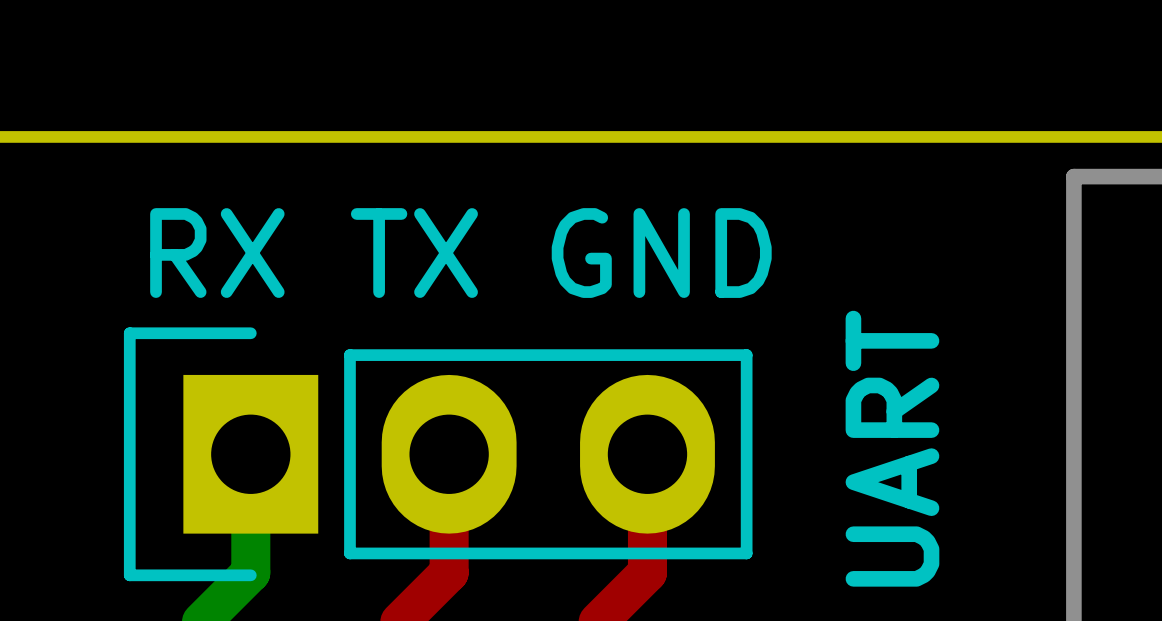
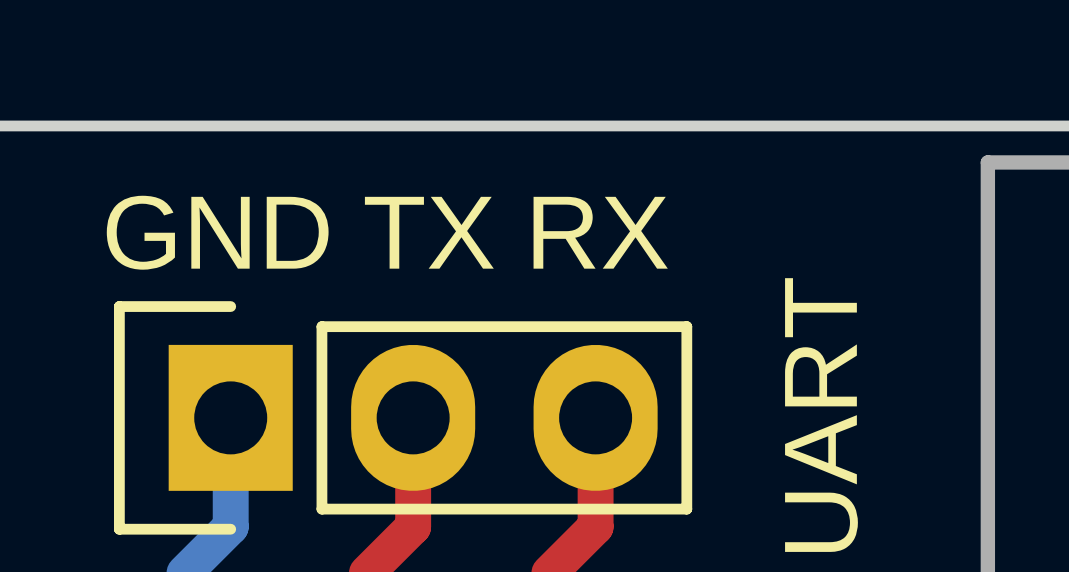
text: RX TX GND (460, 253) -> GND TX RX (387, 232)

